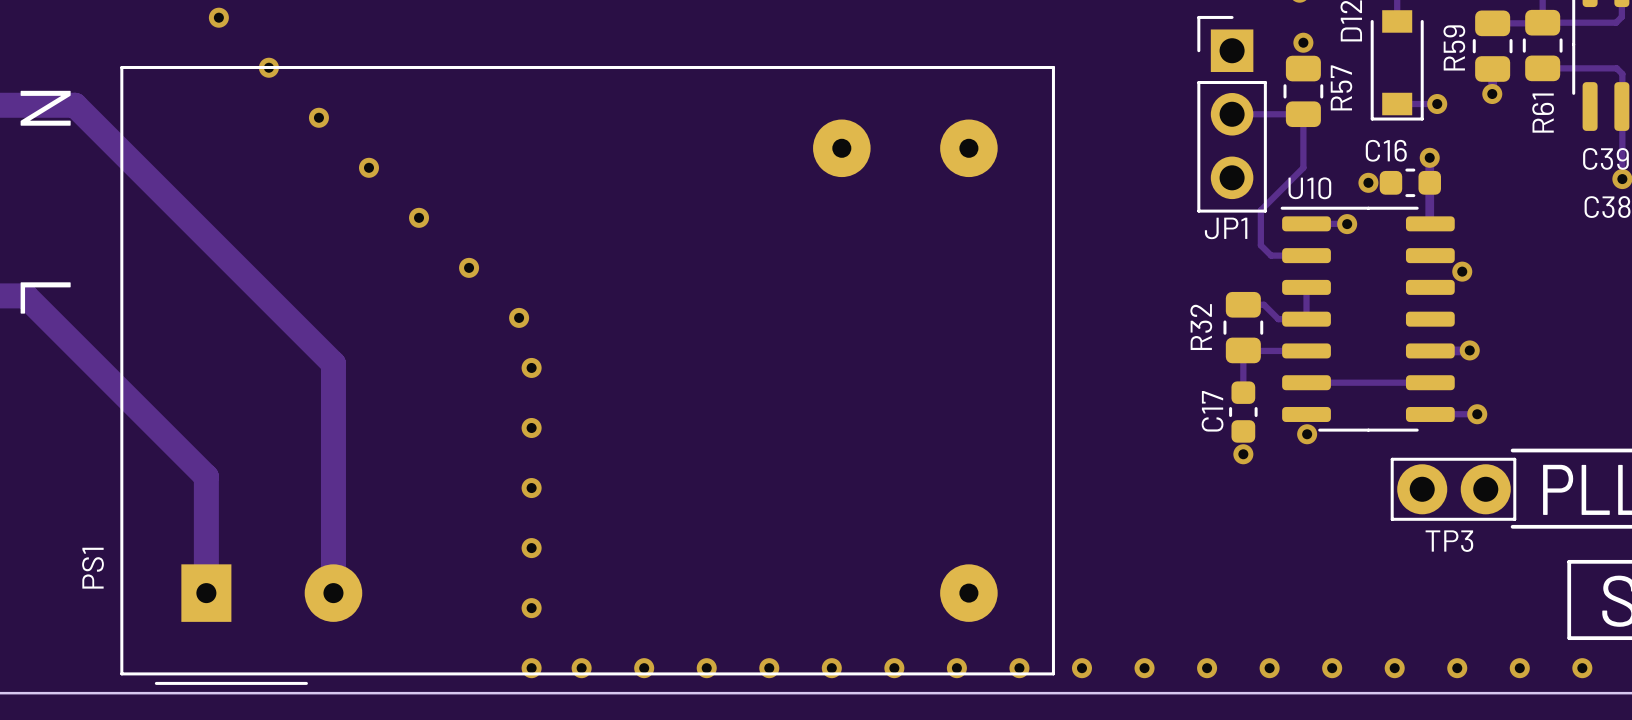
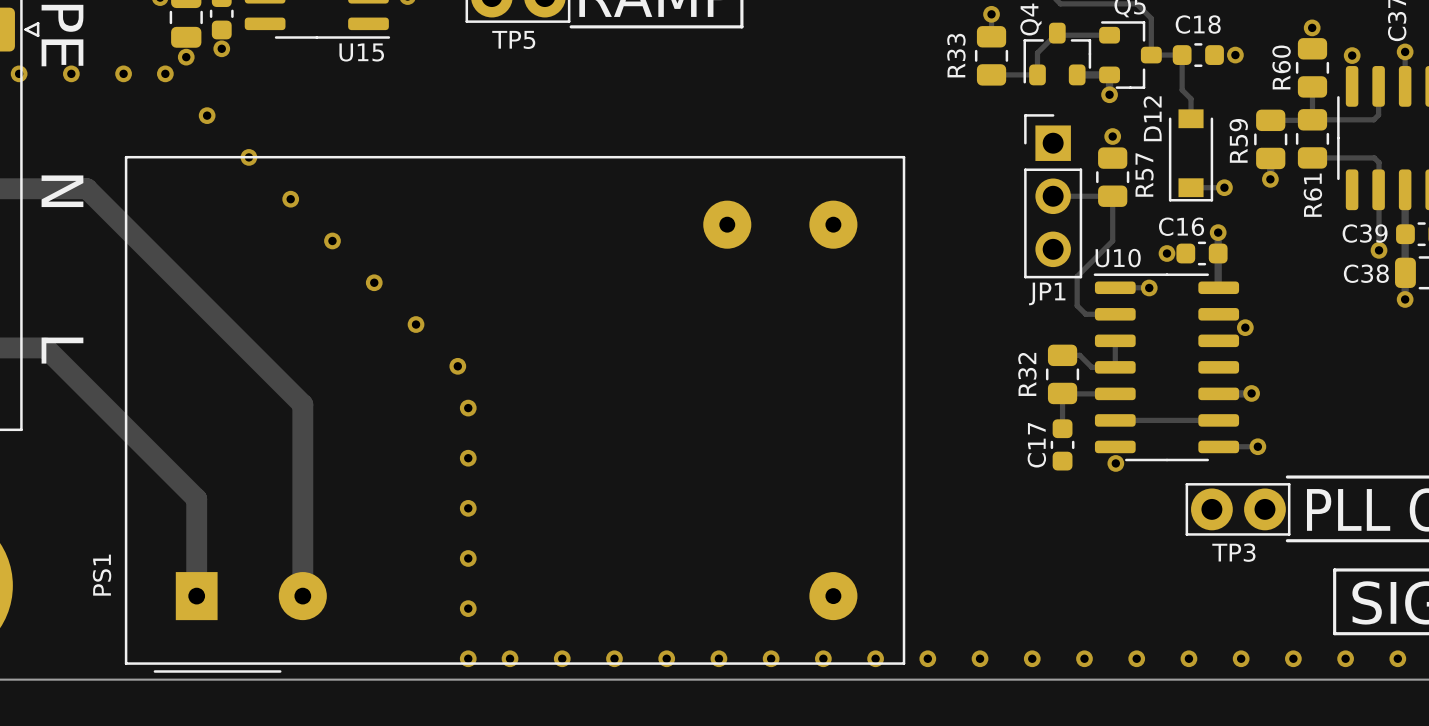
via: (1243, 454) -> none

